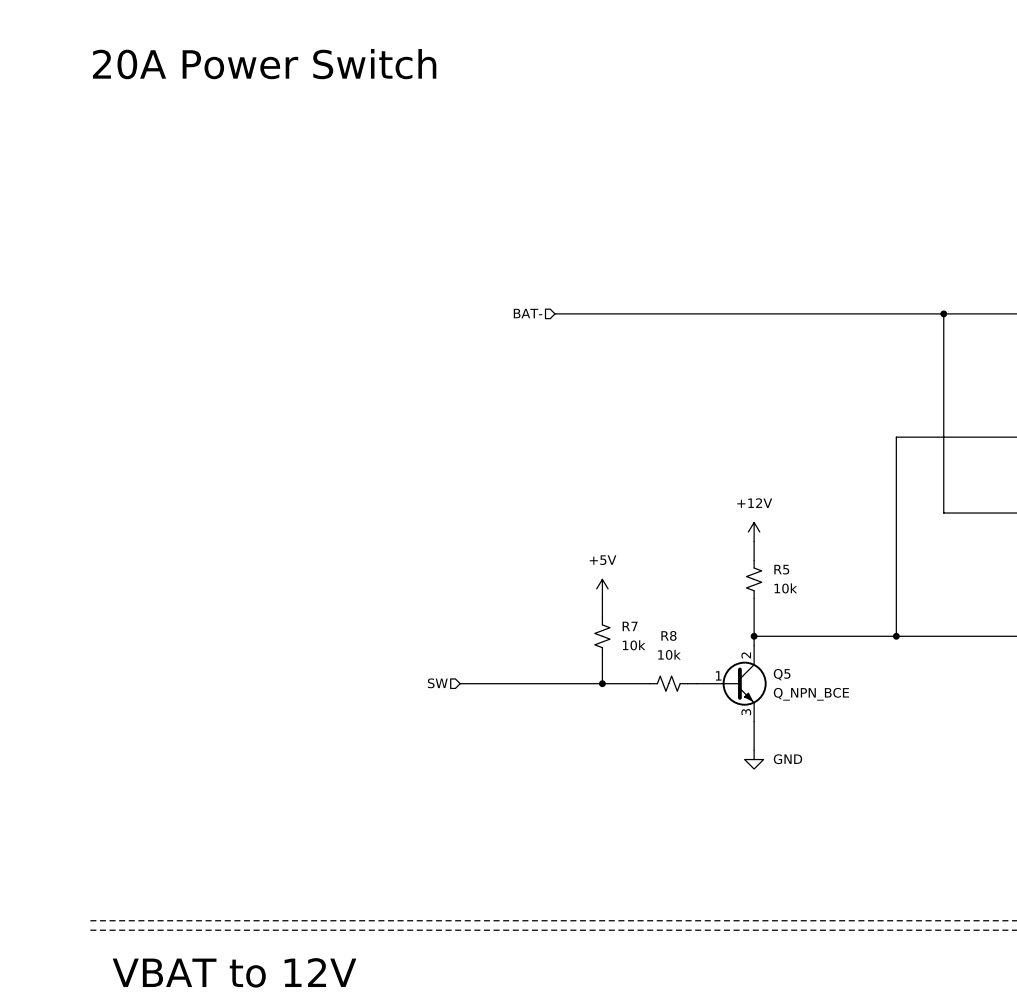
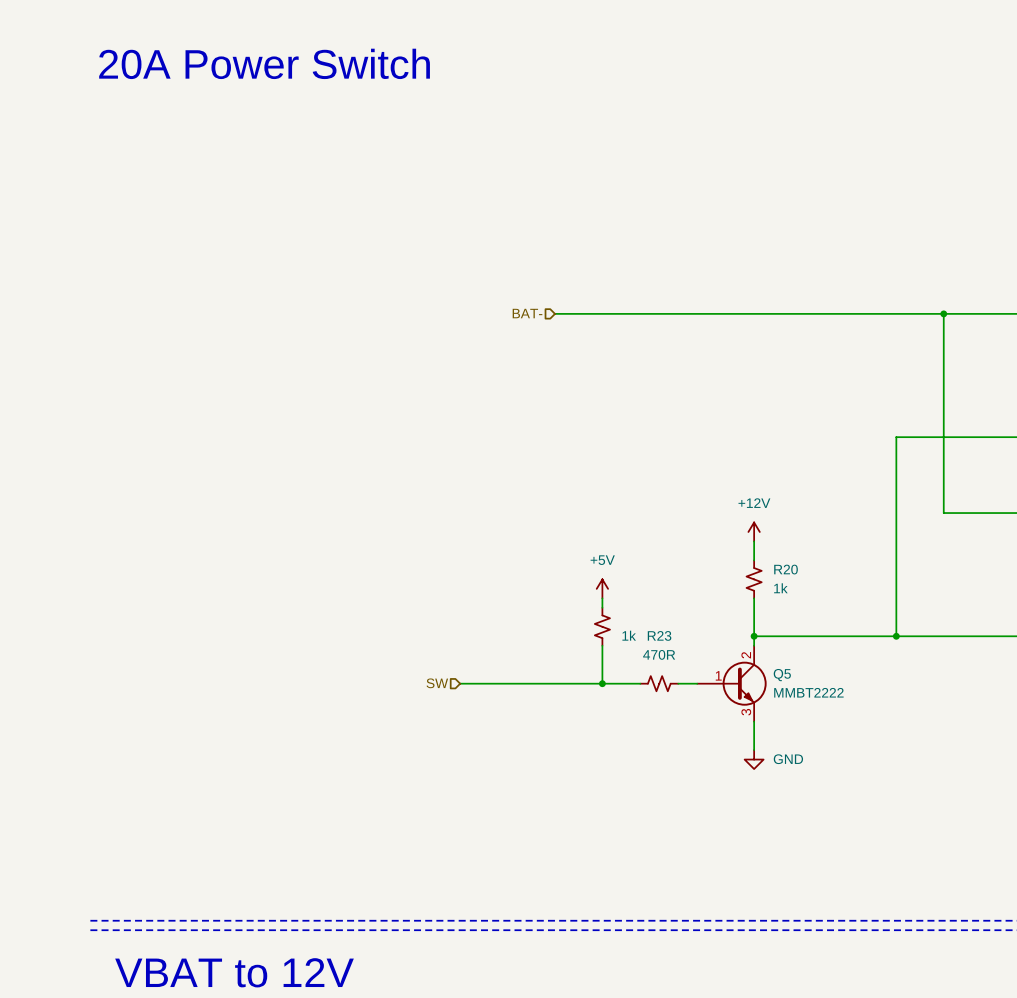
R5 name: R5 (781, 569) -> R20 (786, 569)
R5 value: 10k (785, 588) -> 1k (780, 588)
part: none -> 1k (602, 626)
R7: 10k (602, 636) -> none
R23: none -> 470R (659, 683)
R8: 10k (668, 683) -> none
Q5 value: Q_NPN_BCE (811, 694) -> MMBT2222 (808, 692)

